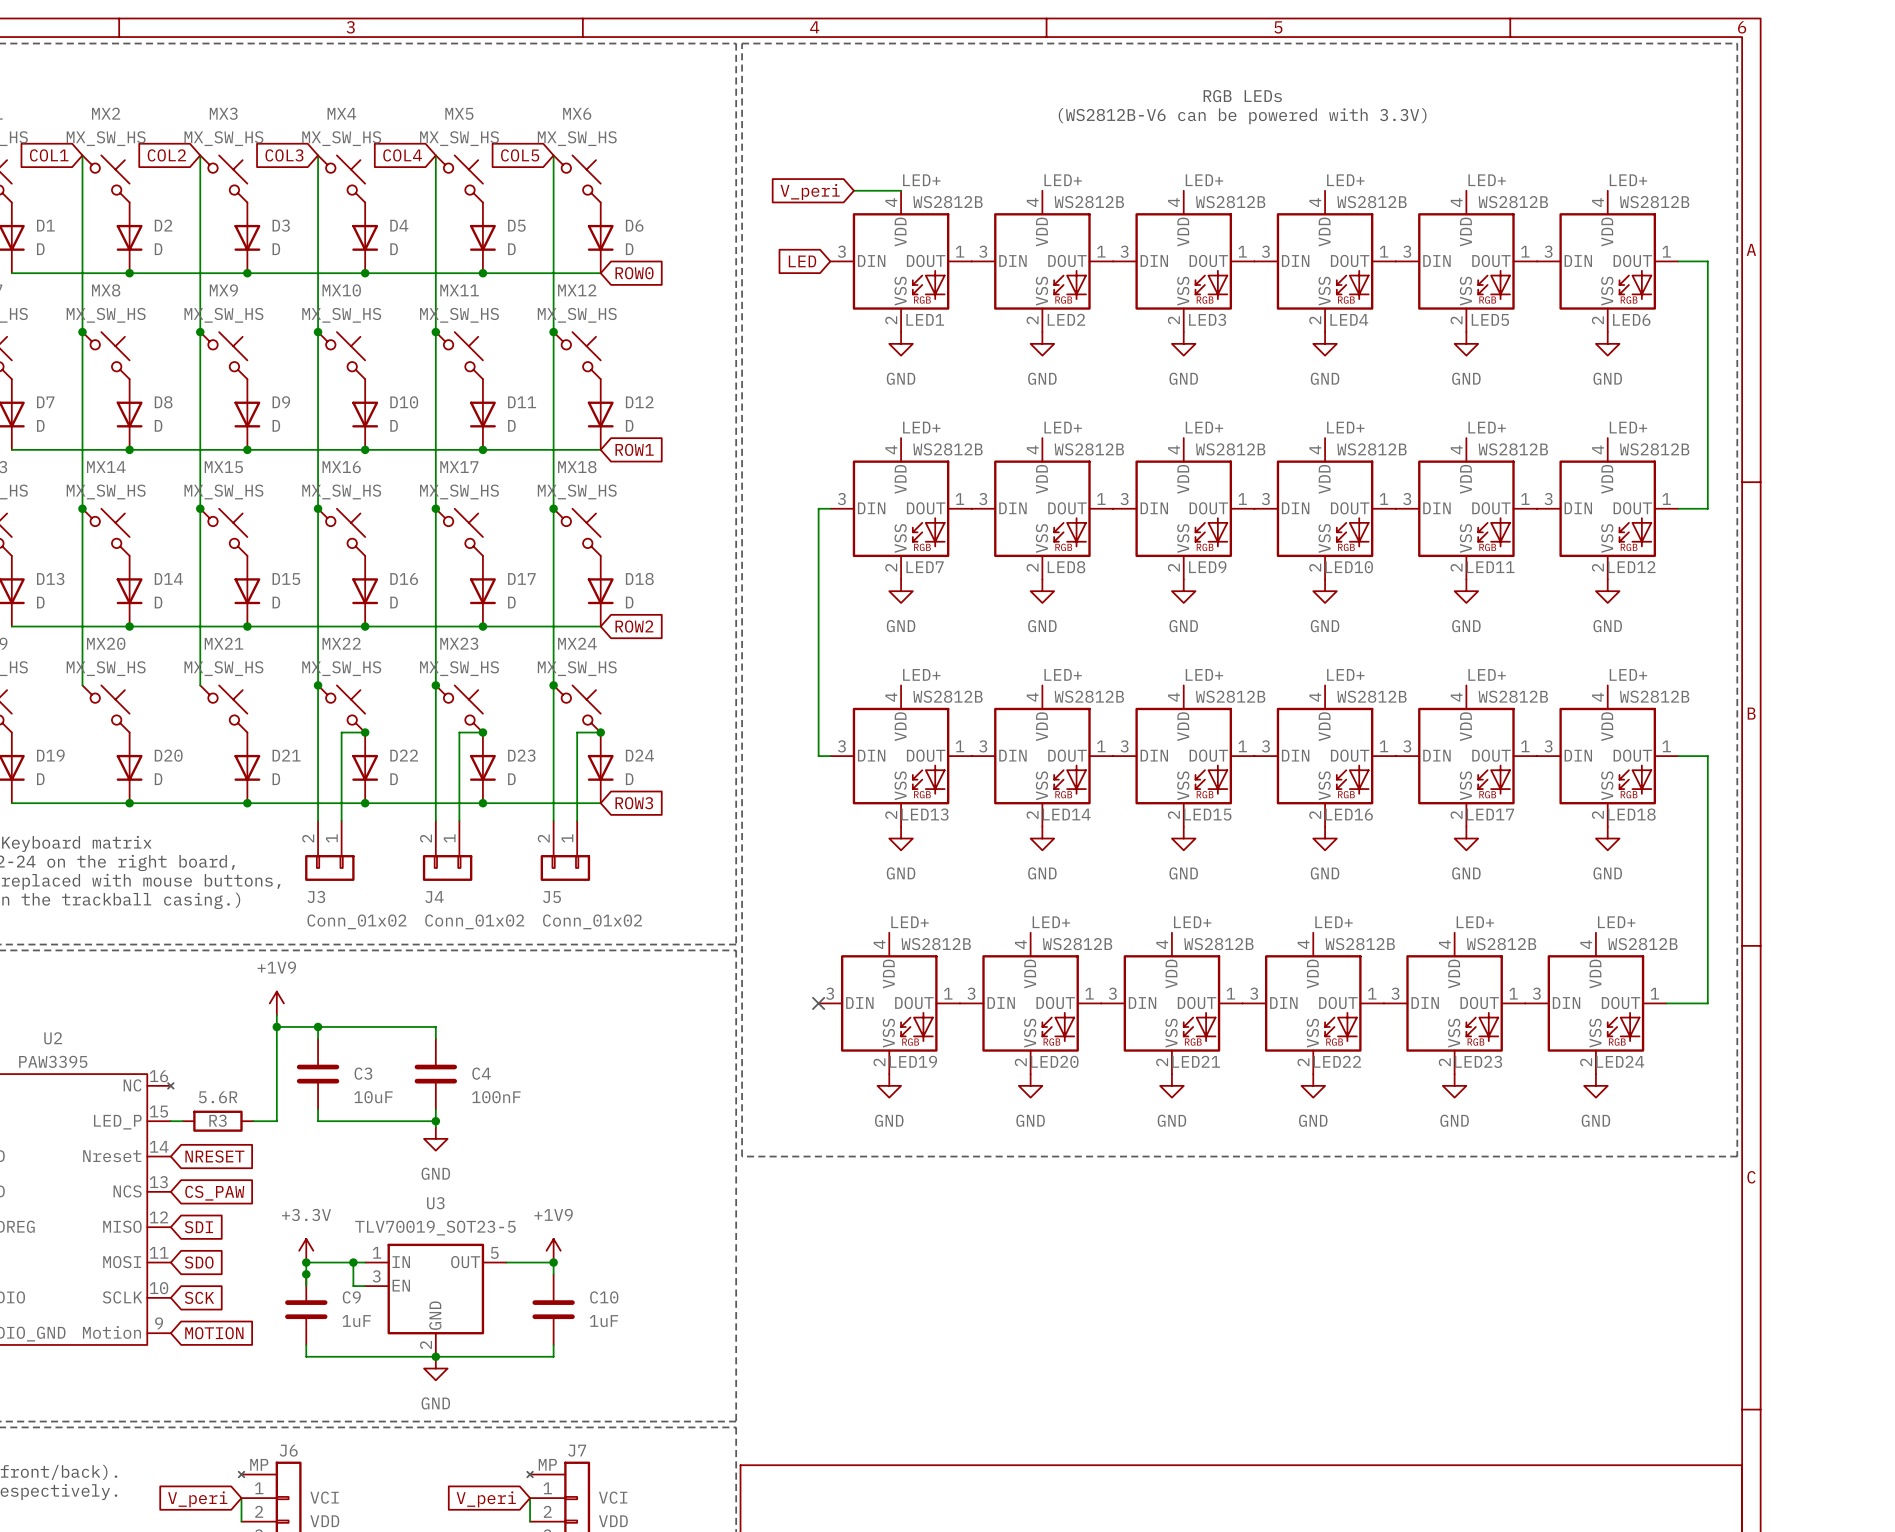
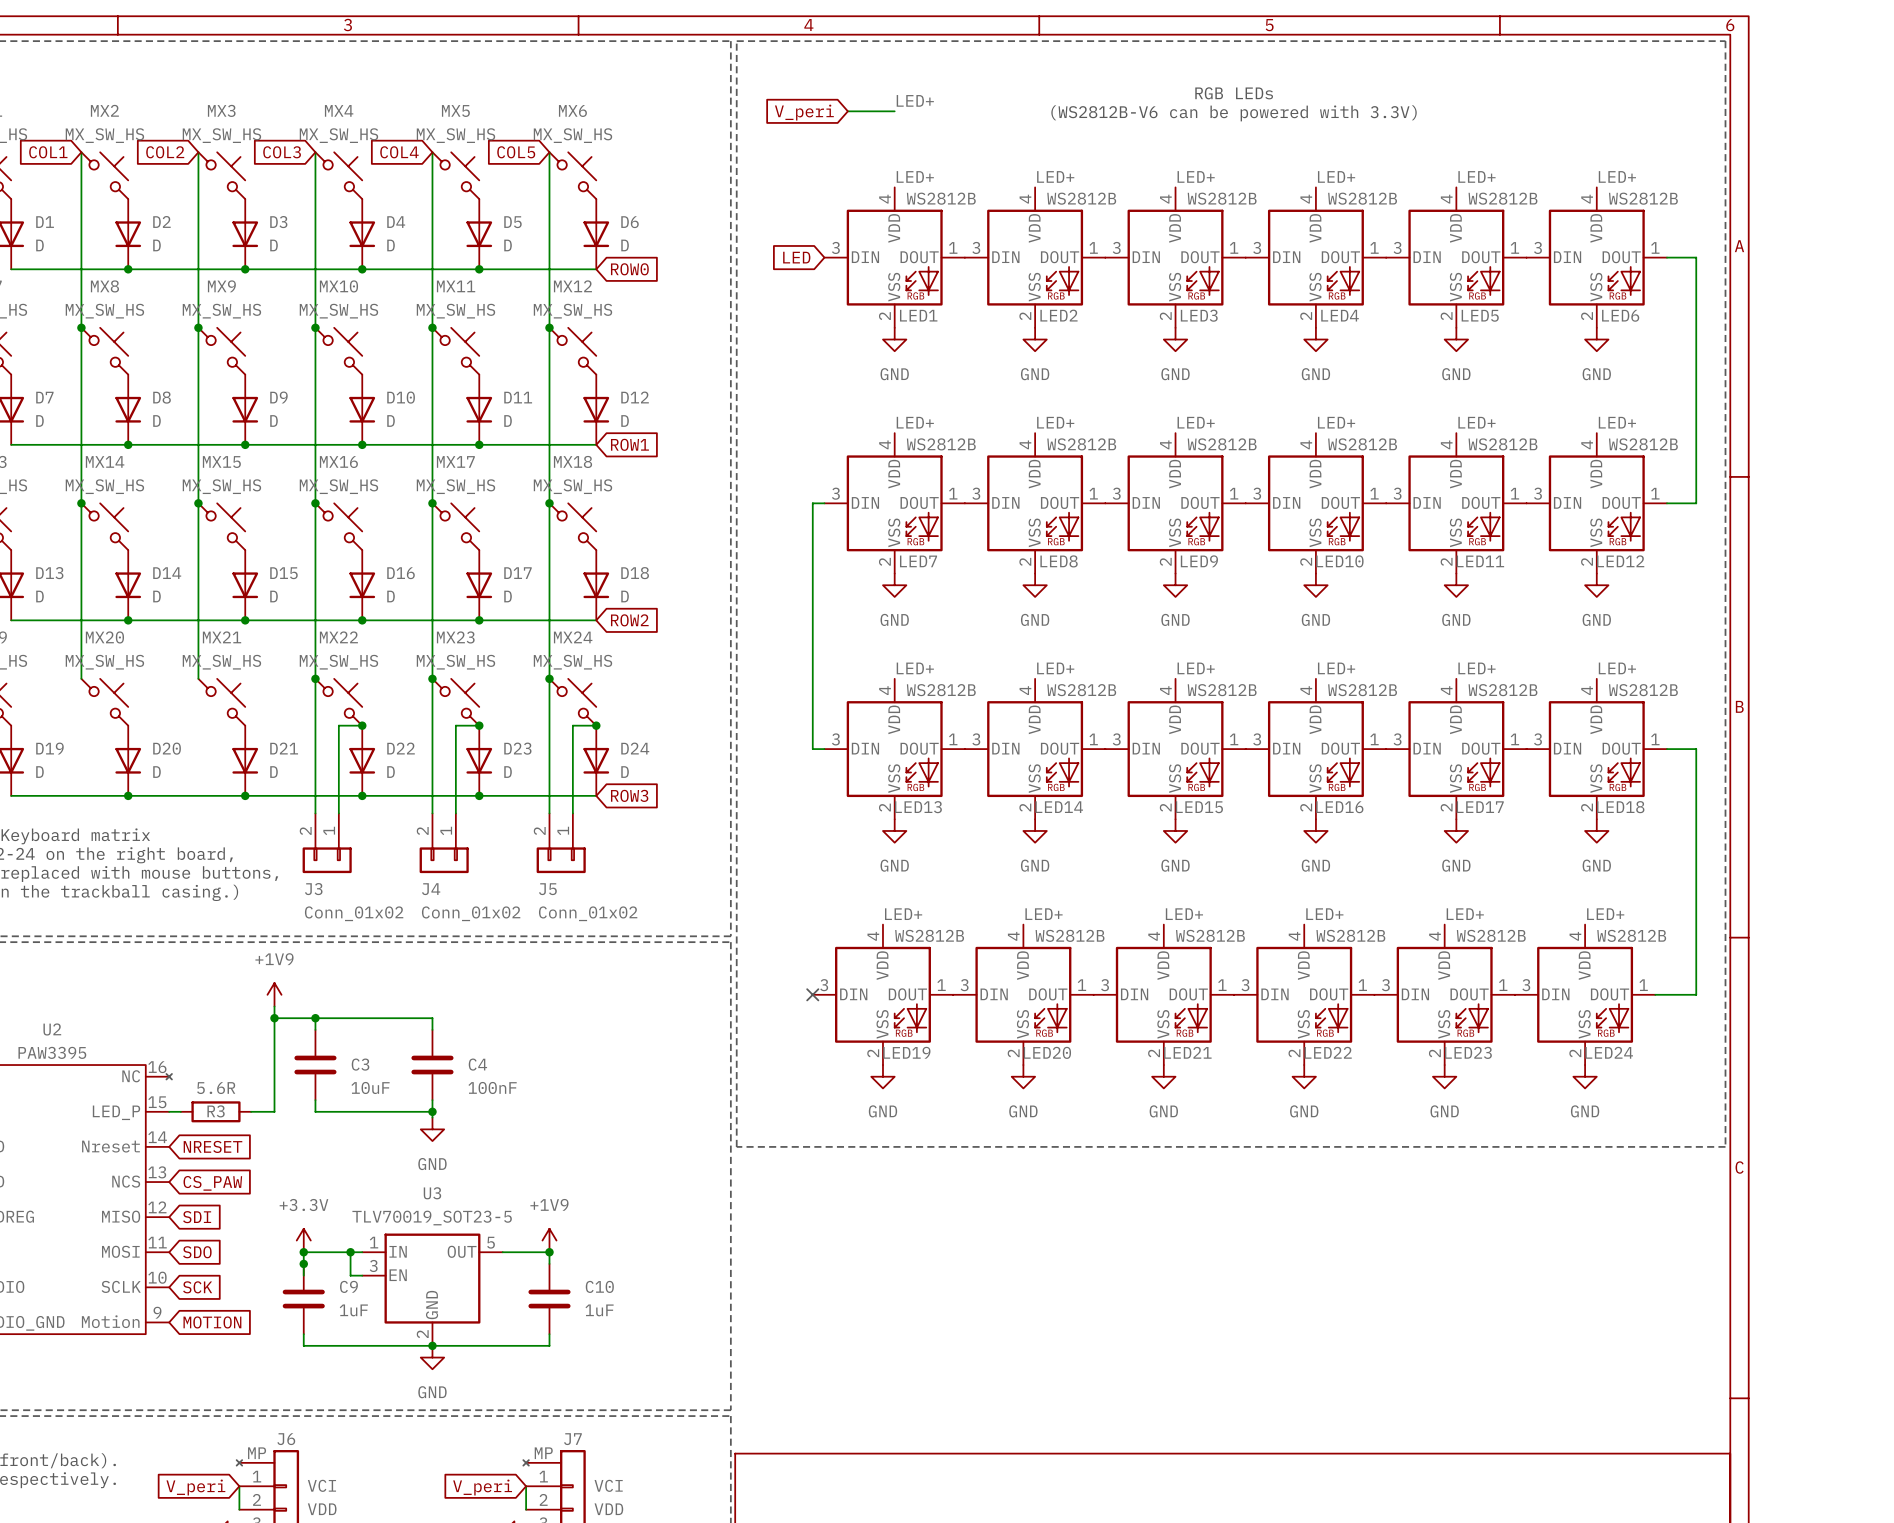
label: none -> LED+ (915, 100)
wire: (853, 190) (901, 190) -> (847, 111) (894, 111)
global label position: V_peri (810, 192) -> V_peri (804, 112)

